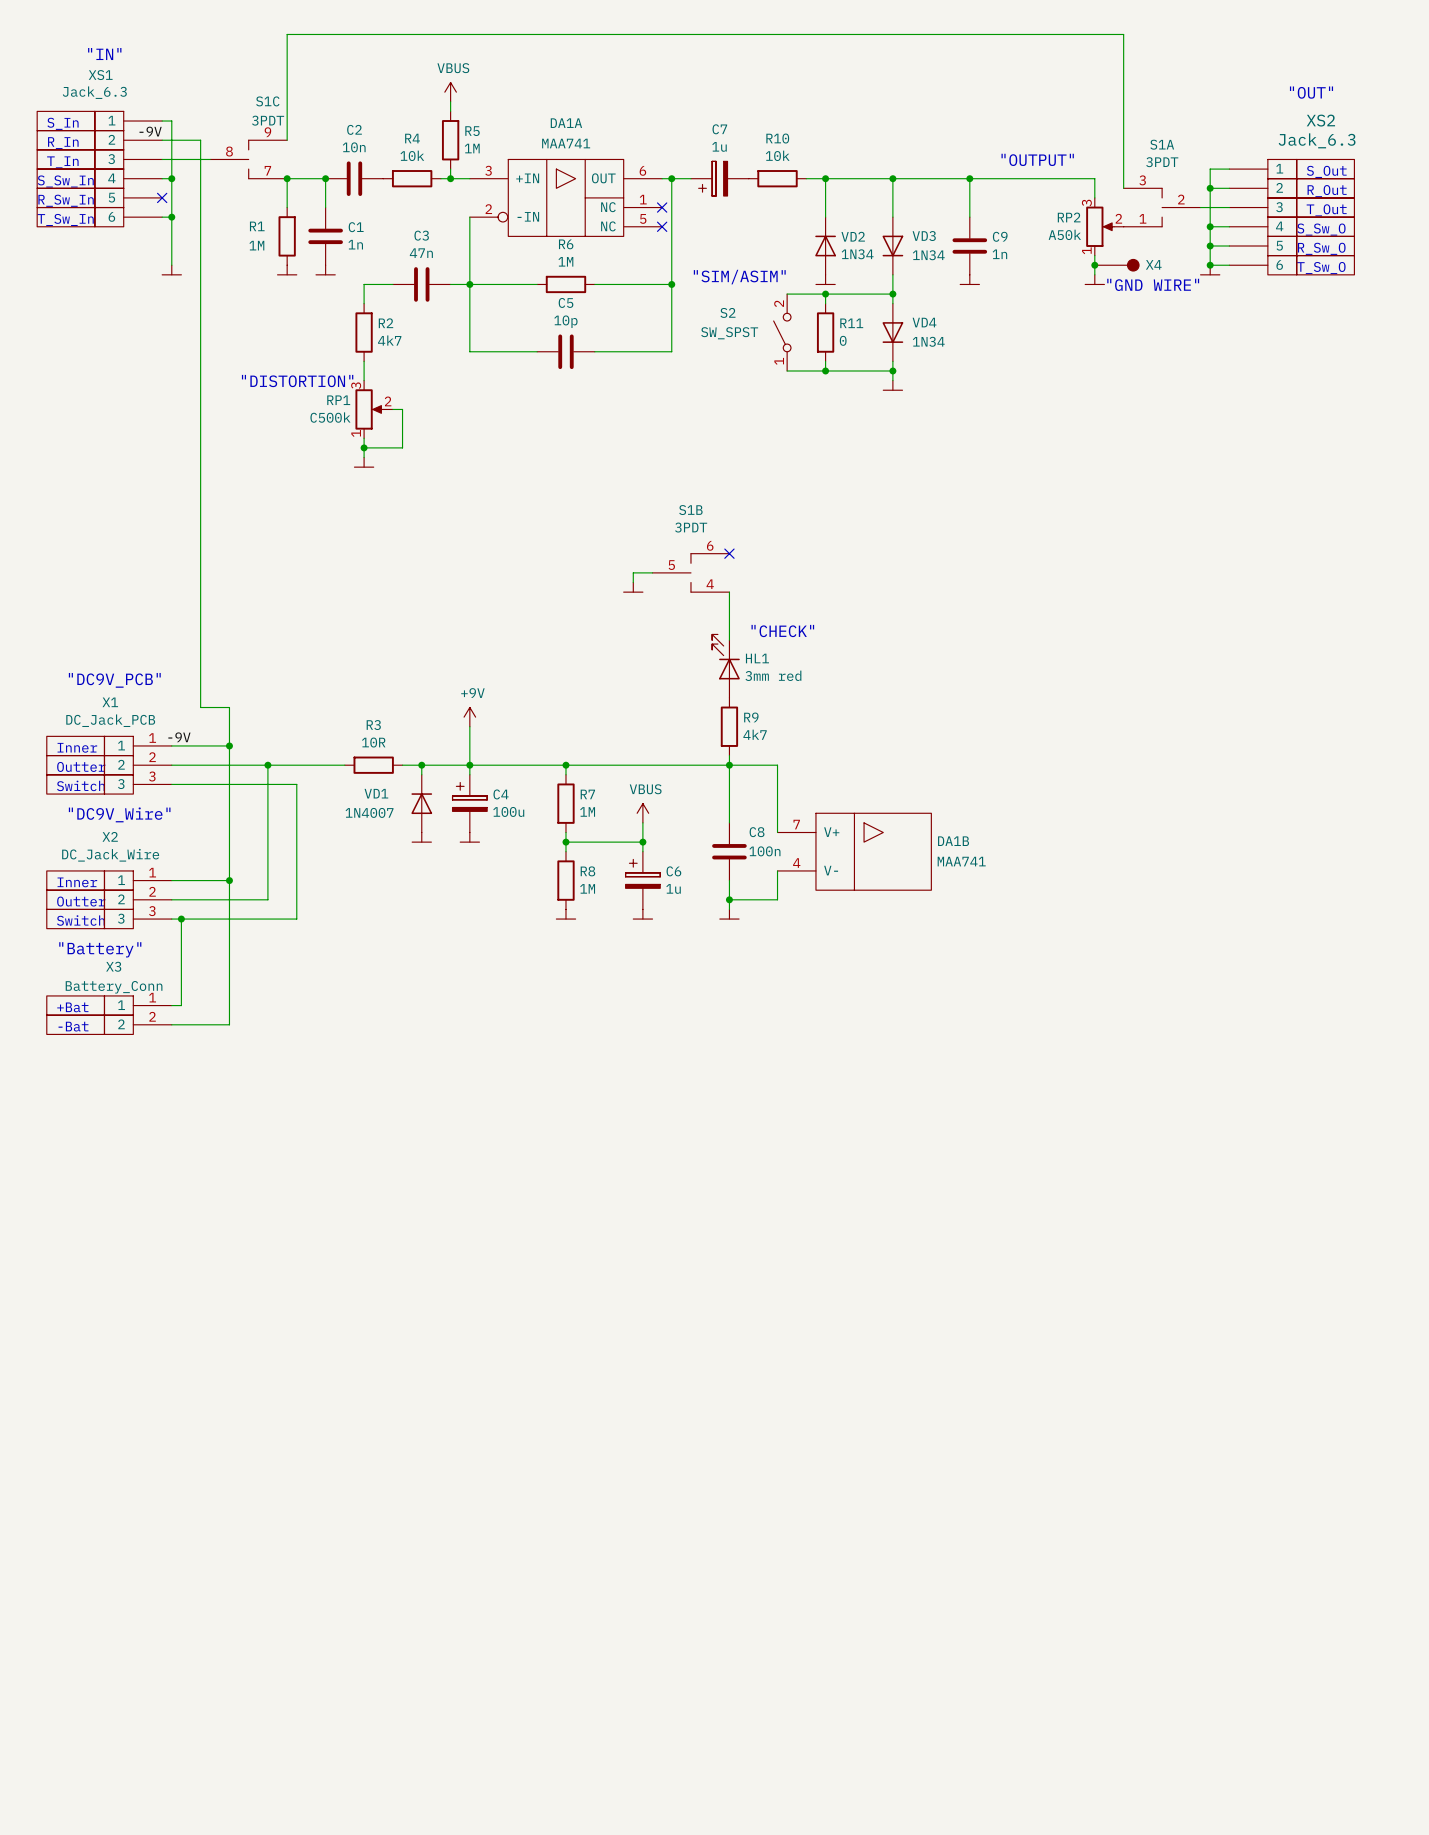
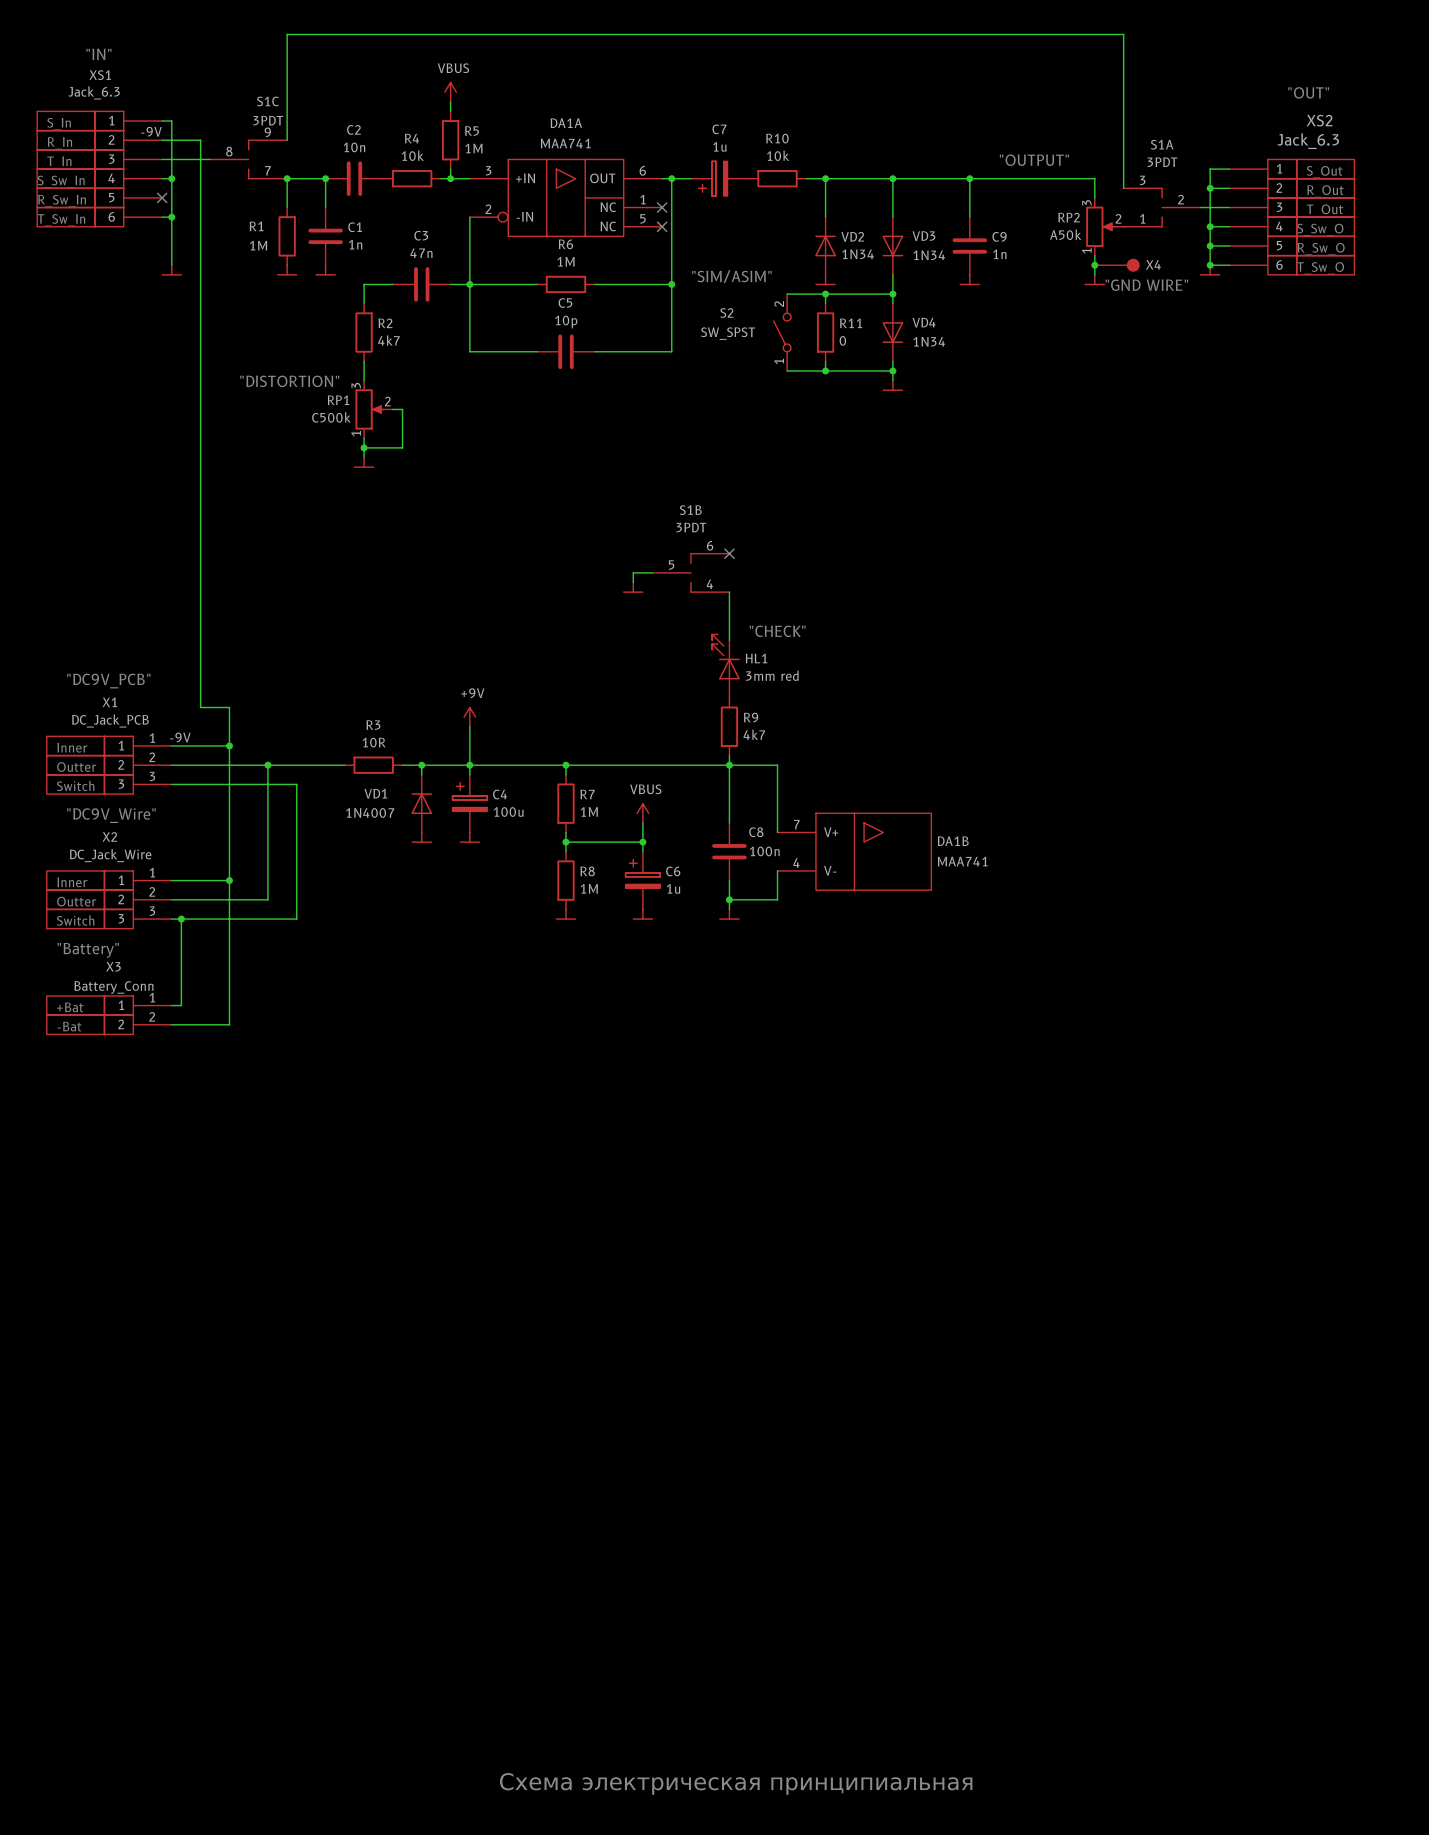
text: none -> Схема электрическая принципиальная (736, 1783)

